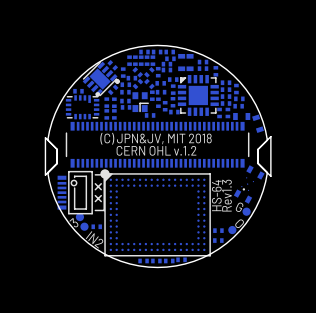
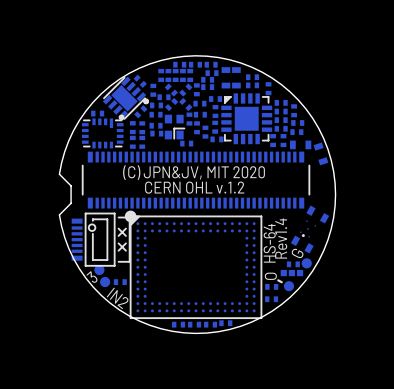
board edge: (45, 137) (45, 175) (57, 163) (57, 149) (45, 137) -> none
text: (C) JPN&JV, MIT 2018 (156, 138) -> (C) JPN&JV, MIT 2020 (193, 172)
board edge: (47, 140) (52, 122) (63, 96) (75, 82) (88, 69) (104, 59) (121, 51) (148, 45) (166, 45) (185, 48) (202, 55) (218, 63) (240, 82) (255, 104) (265, 130) (267, 140) (258, 149) -> (59, 174) (64, 151) (73, 130) (85, 111) (110, 86) (129, 73) (161, 60) (183, 56) (206, 56) (229, 59) (251, 67) (281, 84) (298, 100) (318, 128) (327, 149) (333, 171) (335, 194) (333, 217) (327, 239) (318, 261) (298, 289) (281, 304) (251, 322) (229, 329) (206, 333) (183, 332) (161, 328) (129, 315) (110, 302) (85, 278) (73, 258) (64, 237) (59, 214)
board edge: (258, 149) (258, 163) -> none
board edge: (258, 149) (270, 136) (270, 176) (258, 163) -> none
board edge: (258, 149) (258, 163) -> none
board edge: (258, 163) (267, 172) (265, 181) (255, 207) (240, 230) (218, 248) (202, 257) (185, 263) (166, 267) (148, 267) (121, 261) (104, 253) (88, 243) (75, 230) (63, 216) (52, 190) (47, 172) -> none
text: Rev1.3 (227, 195) -> Rev1.4 (281, 238)
text rotation: 0° (239, 207) -> 90° counterclockwise (297, 253)
part: none -> (293, 264)
part: none -> (291, 273)
text rotation: 0° (239, 223) -> 134.9° counterclockwise (270, 276)
line: none -> (278, 280) (281, 282)

